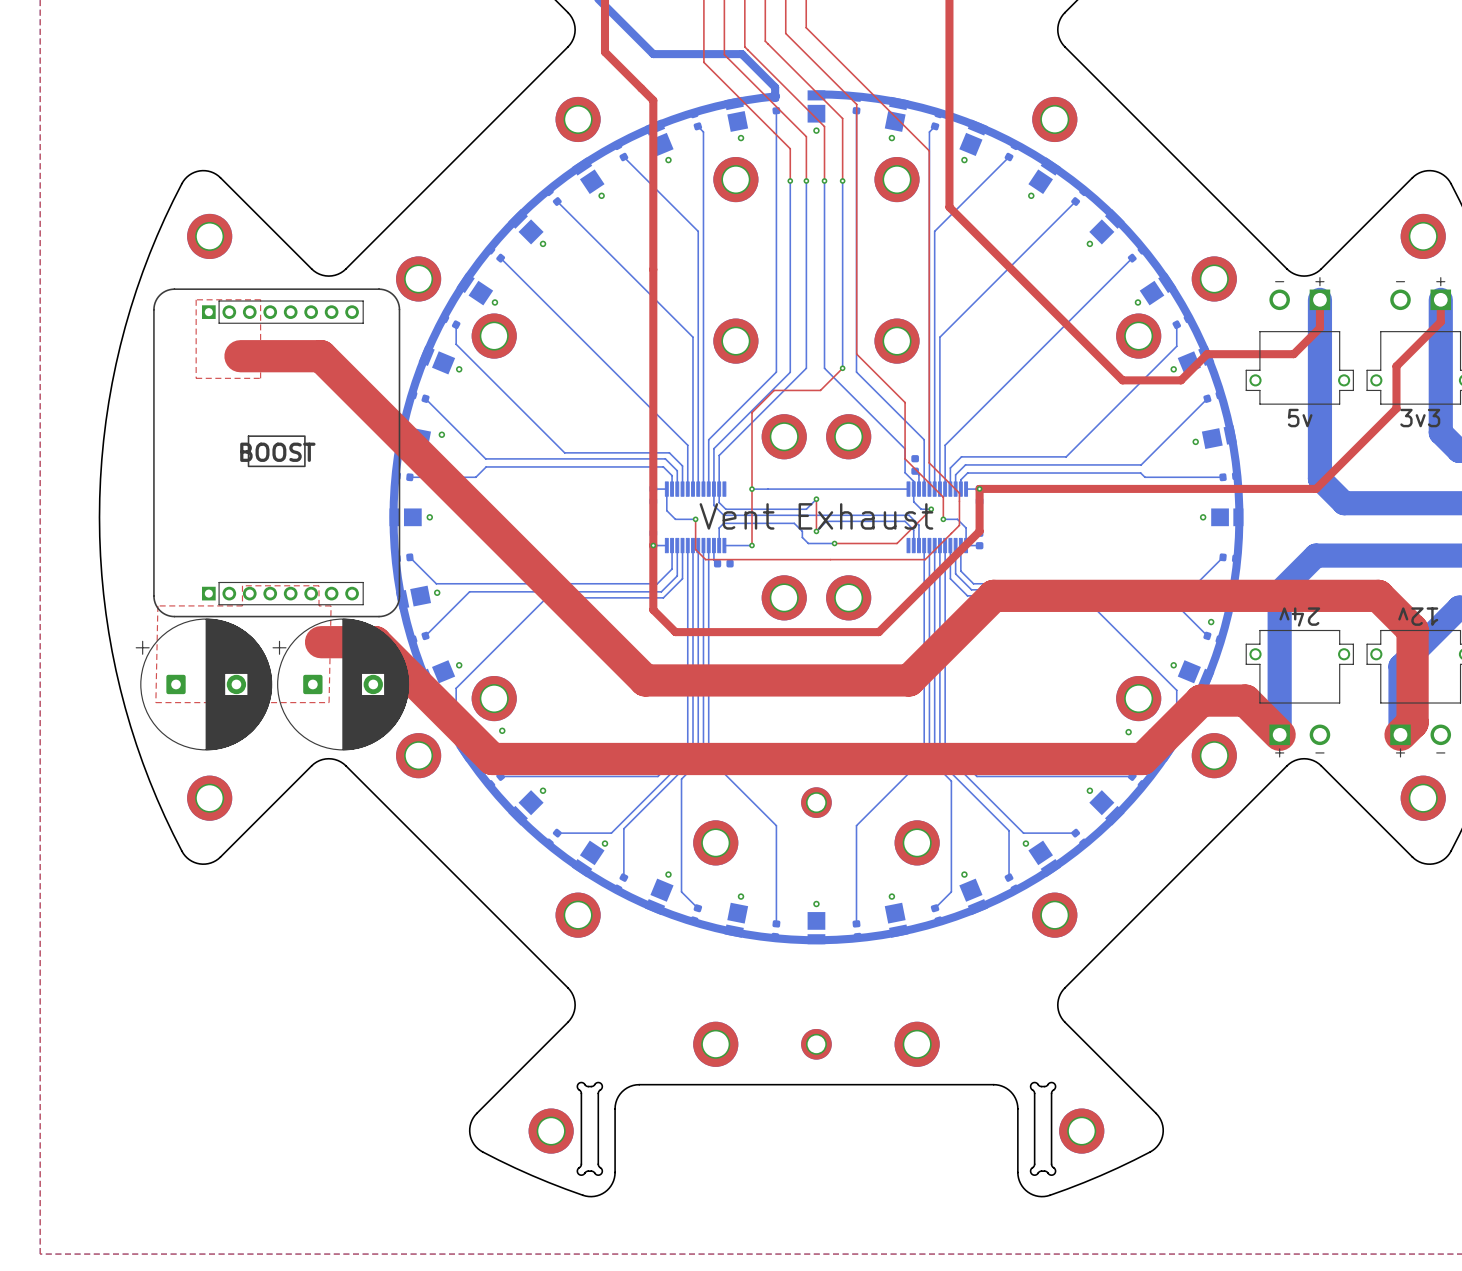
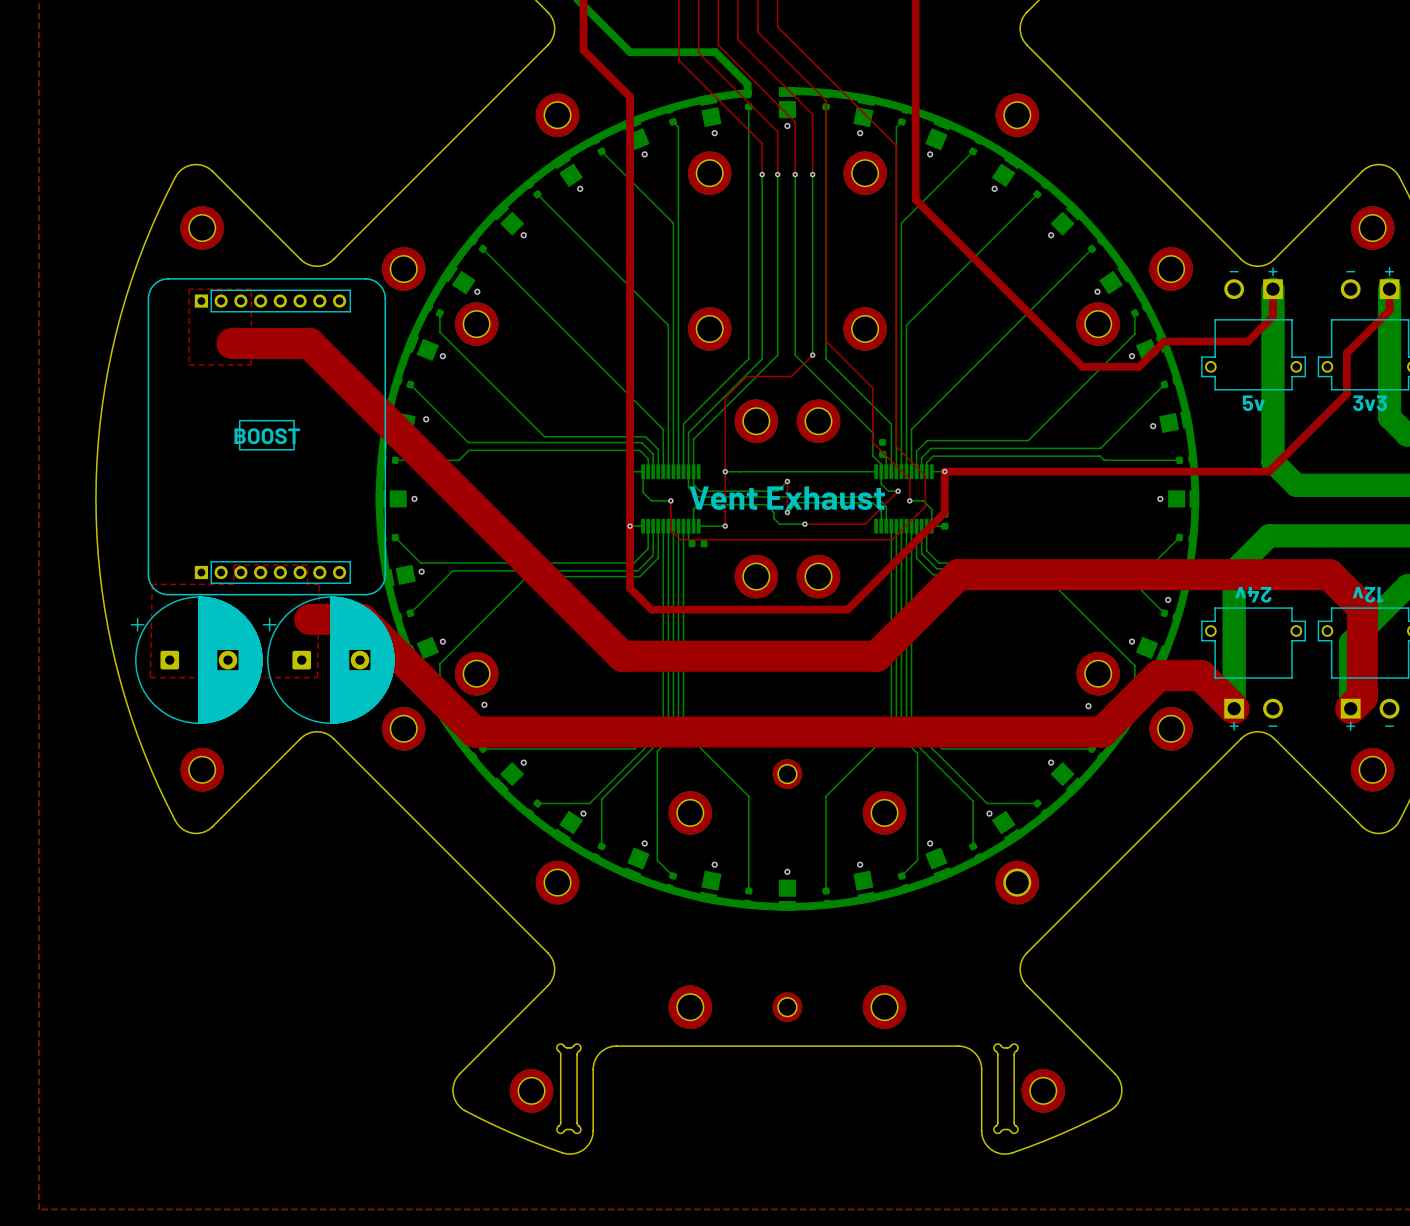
round board edge: none -> [1004, 869, 1031, 896]

